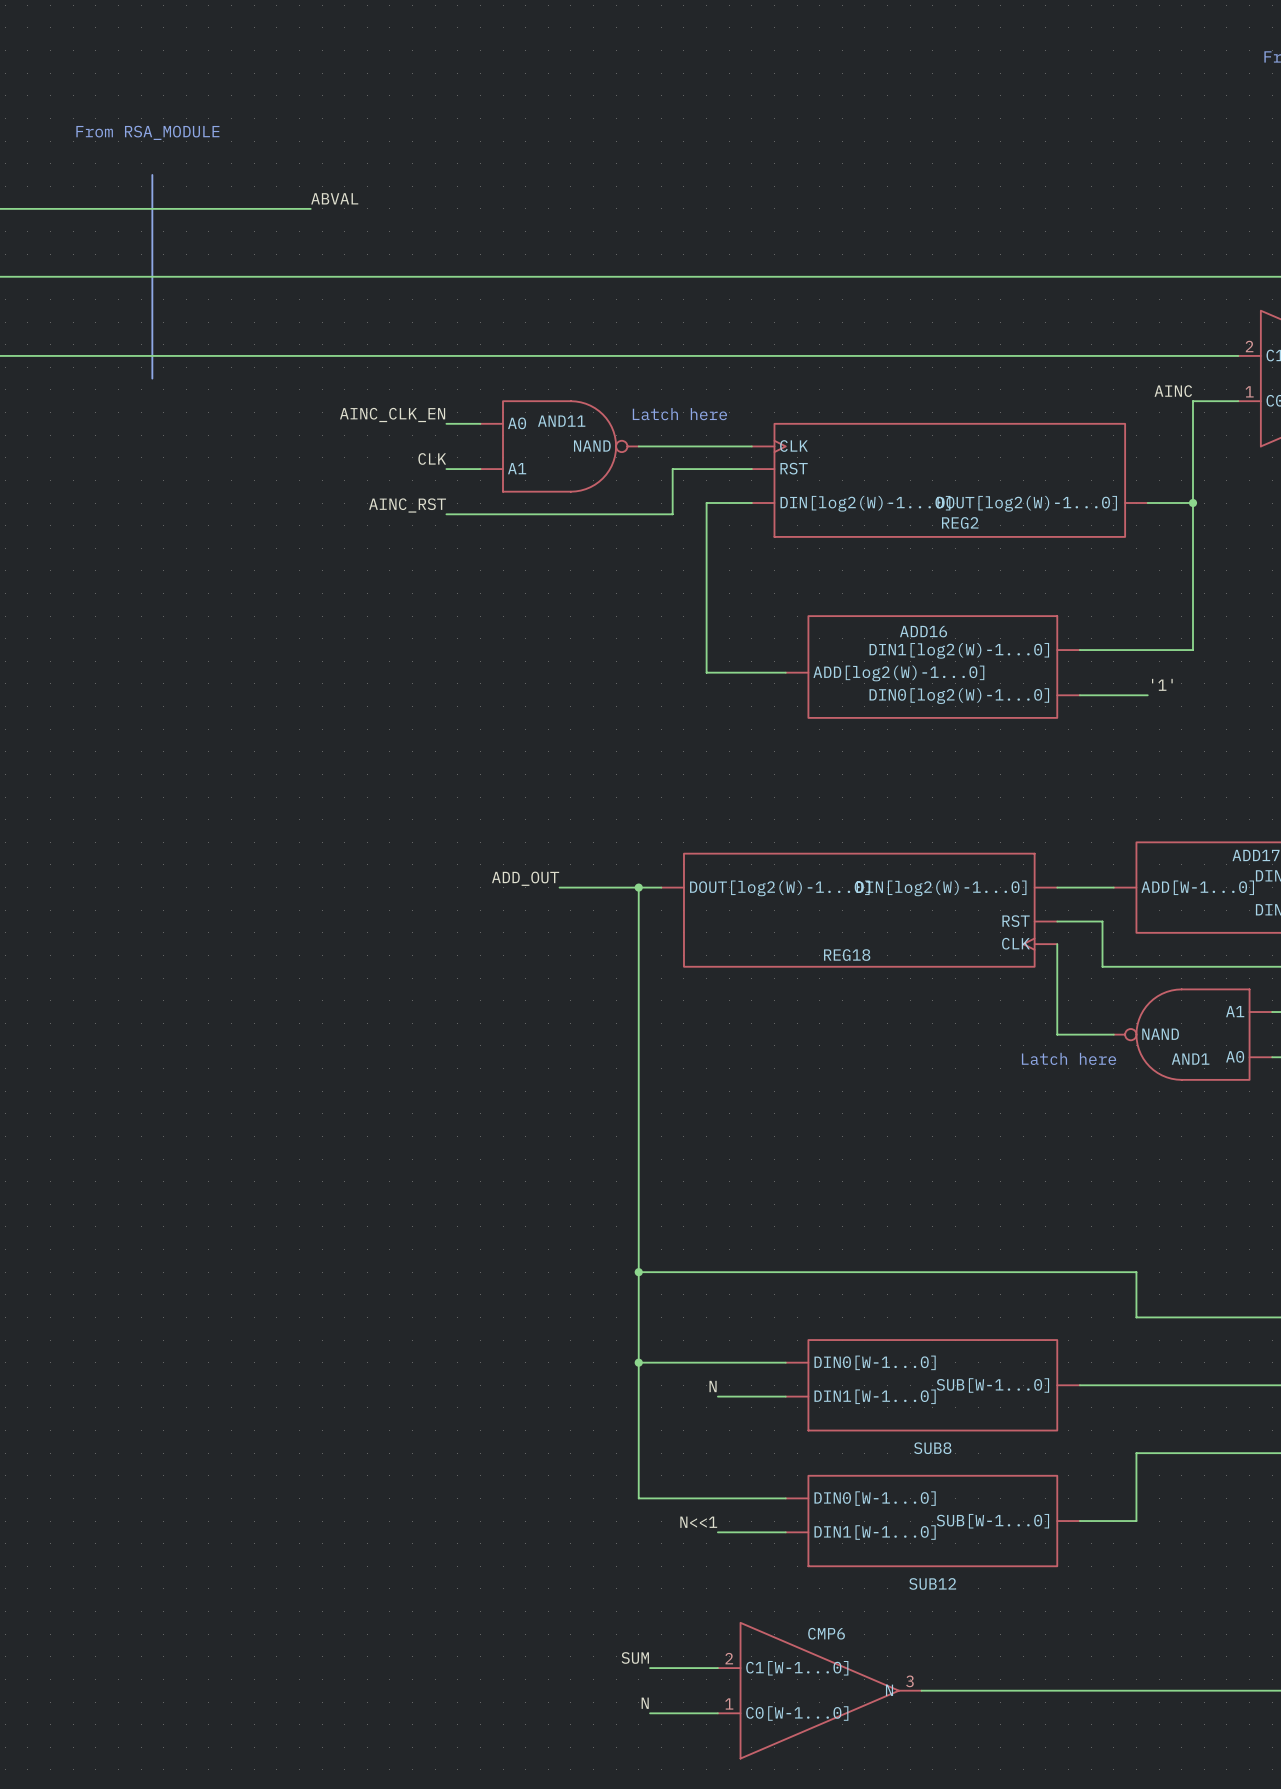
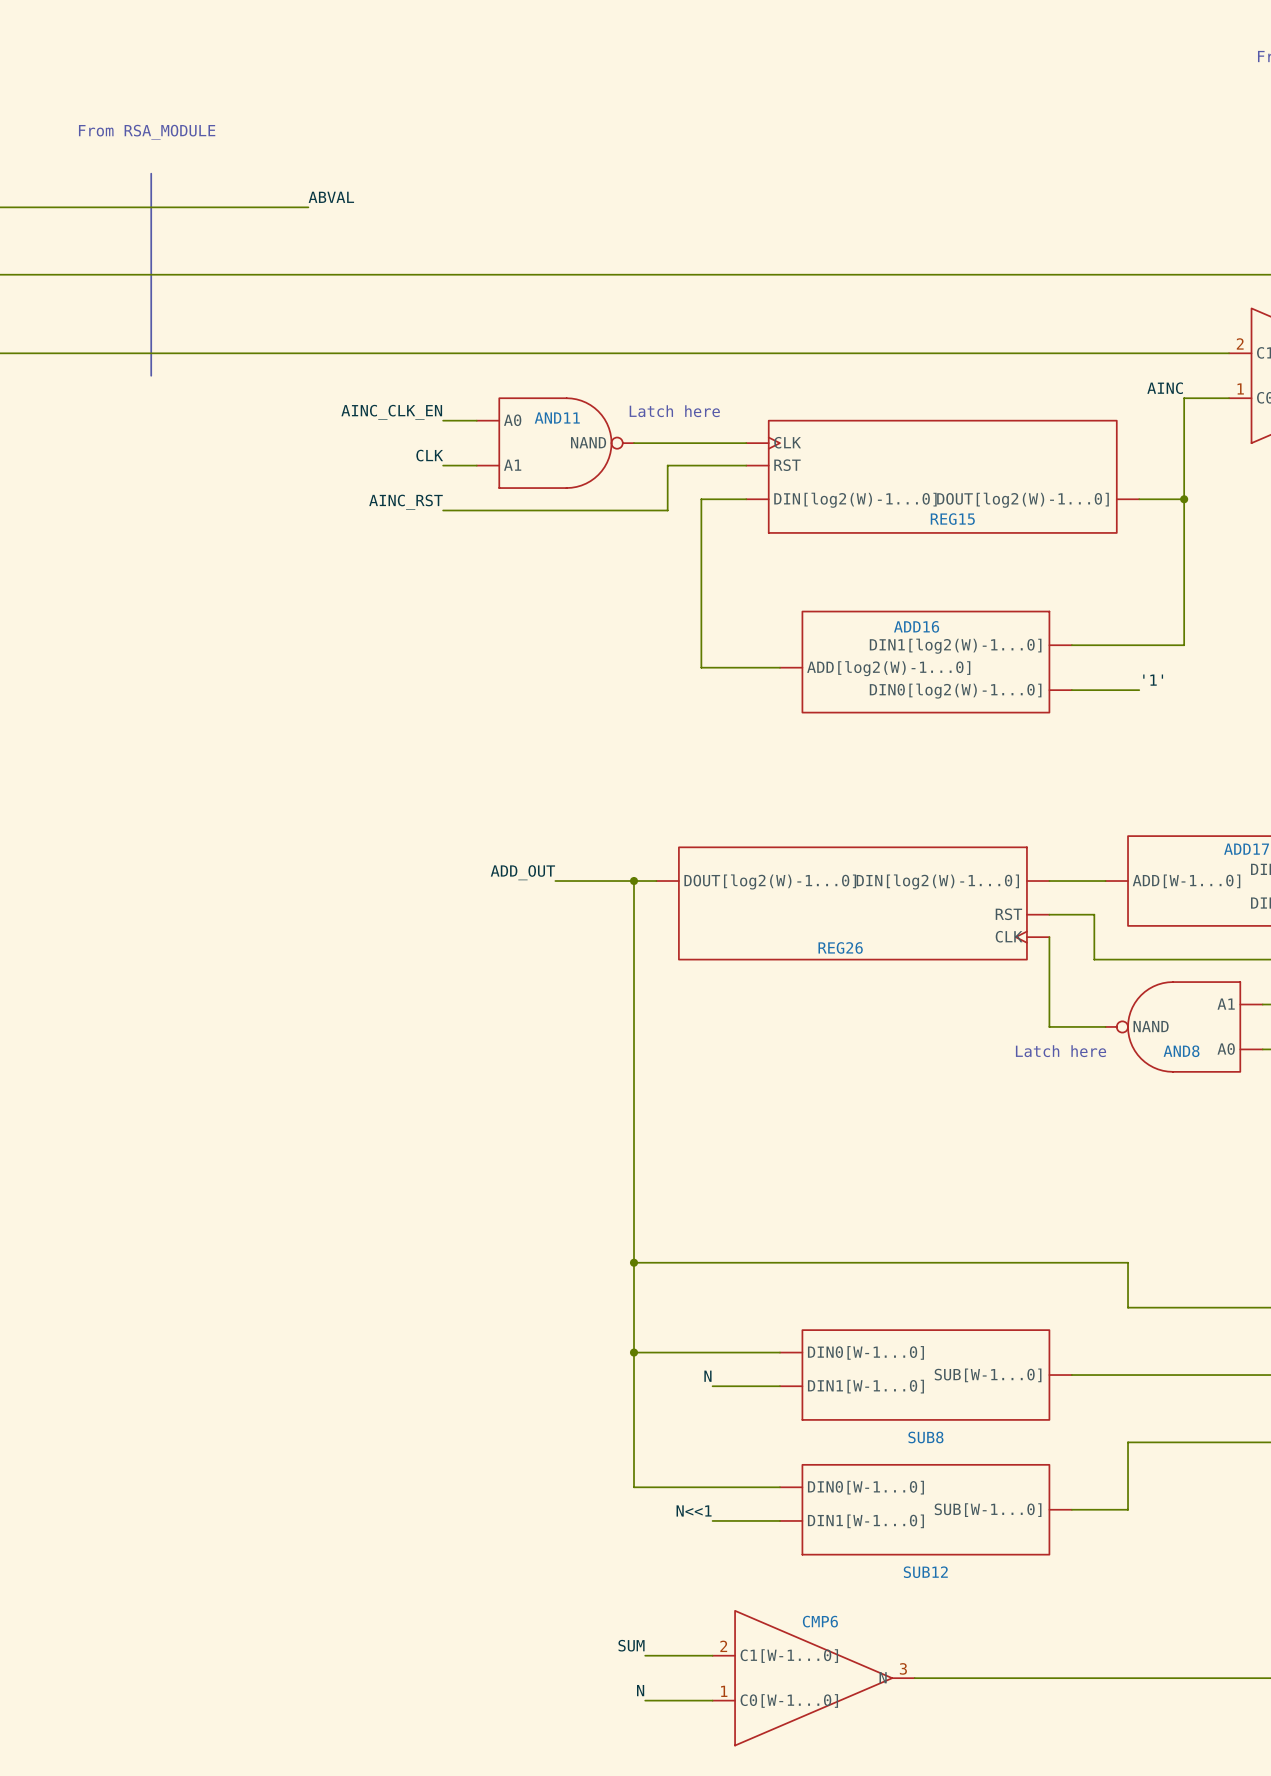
REG2 name: REG2 (960, 522) -> REG15 (952, 519)
REG18 name: REG18 (847, 955) -> REG26 (840, 947)
AND1 name: AND1 (1190, 1059) -> AND8 (1181, 1051)

